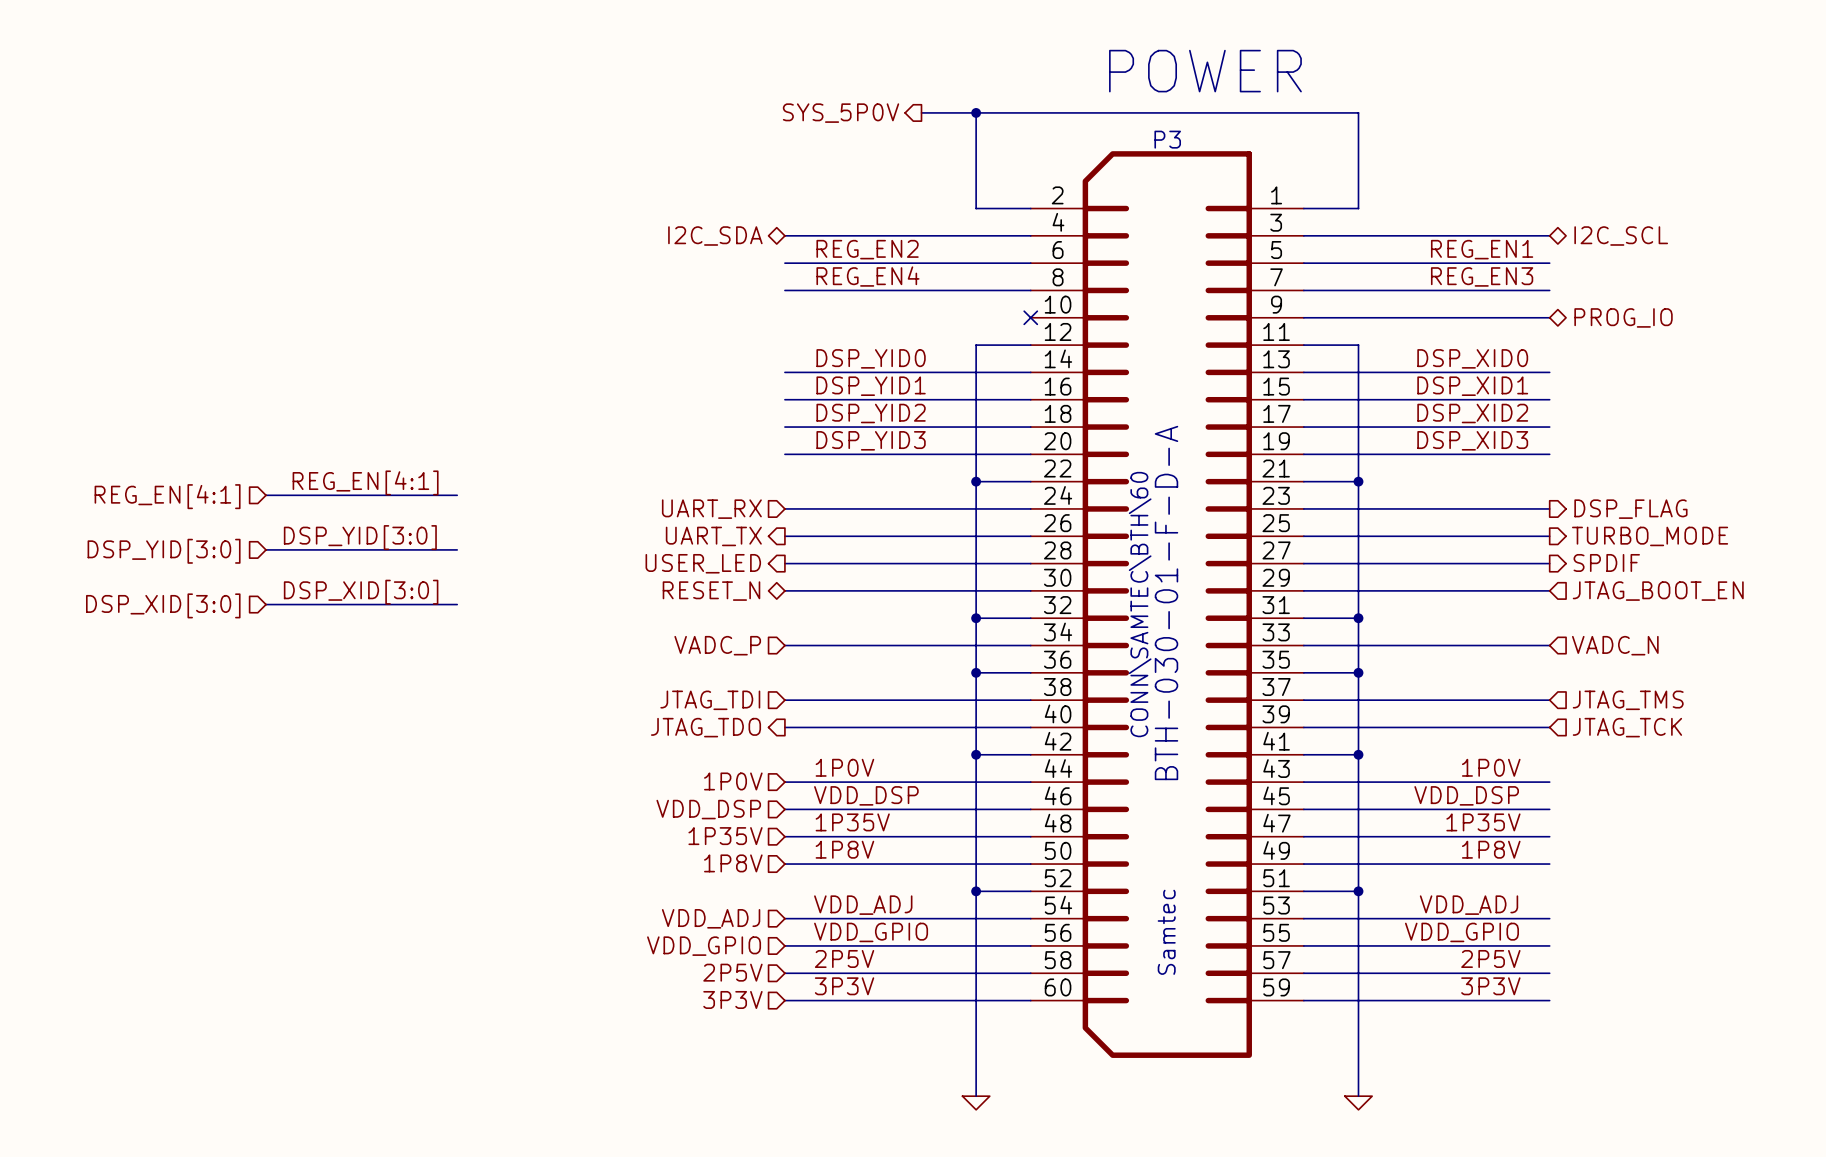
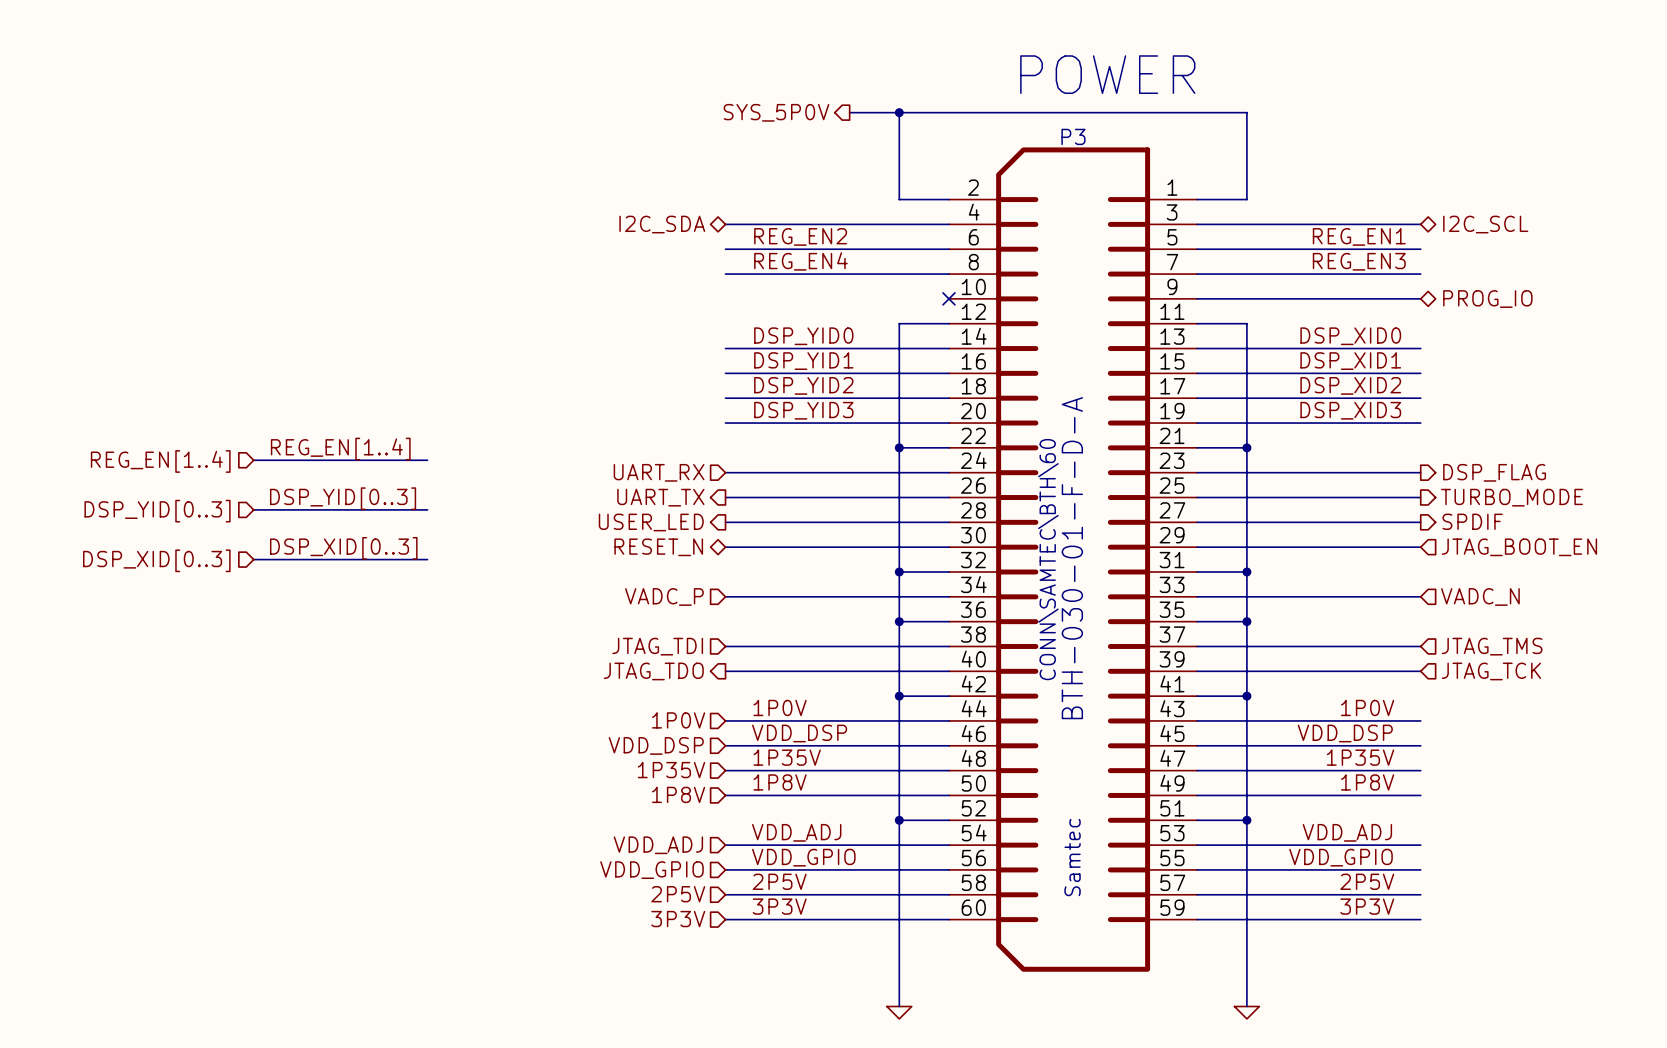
label: REG_EN[4:1] (365, 482) -> REG_EN[1..4] (340, 449)
hierarchical label: REG_EN[4:1] (167, 496) -> REG_EN[1..4] (160, 461)
label: DSP_YID[3:0] (360, 537) -> DSP_YID[0..3] (343, 498)
hierarchical label: DSP_YID[3:0] (164, 551) -> DSP_YID[0..3] (157, 511)
label: DSP_XID[3:0] (361, 592) -> DSP_XID[0..3] (343, 548)
hierarchical label: DSP_XID[3:0] (163, 605) -> DSP_XID[0..3] (156, 560)

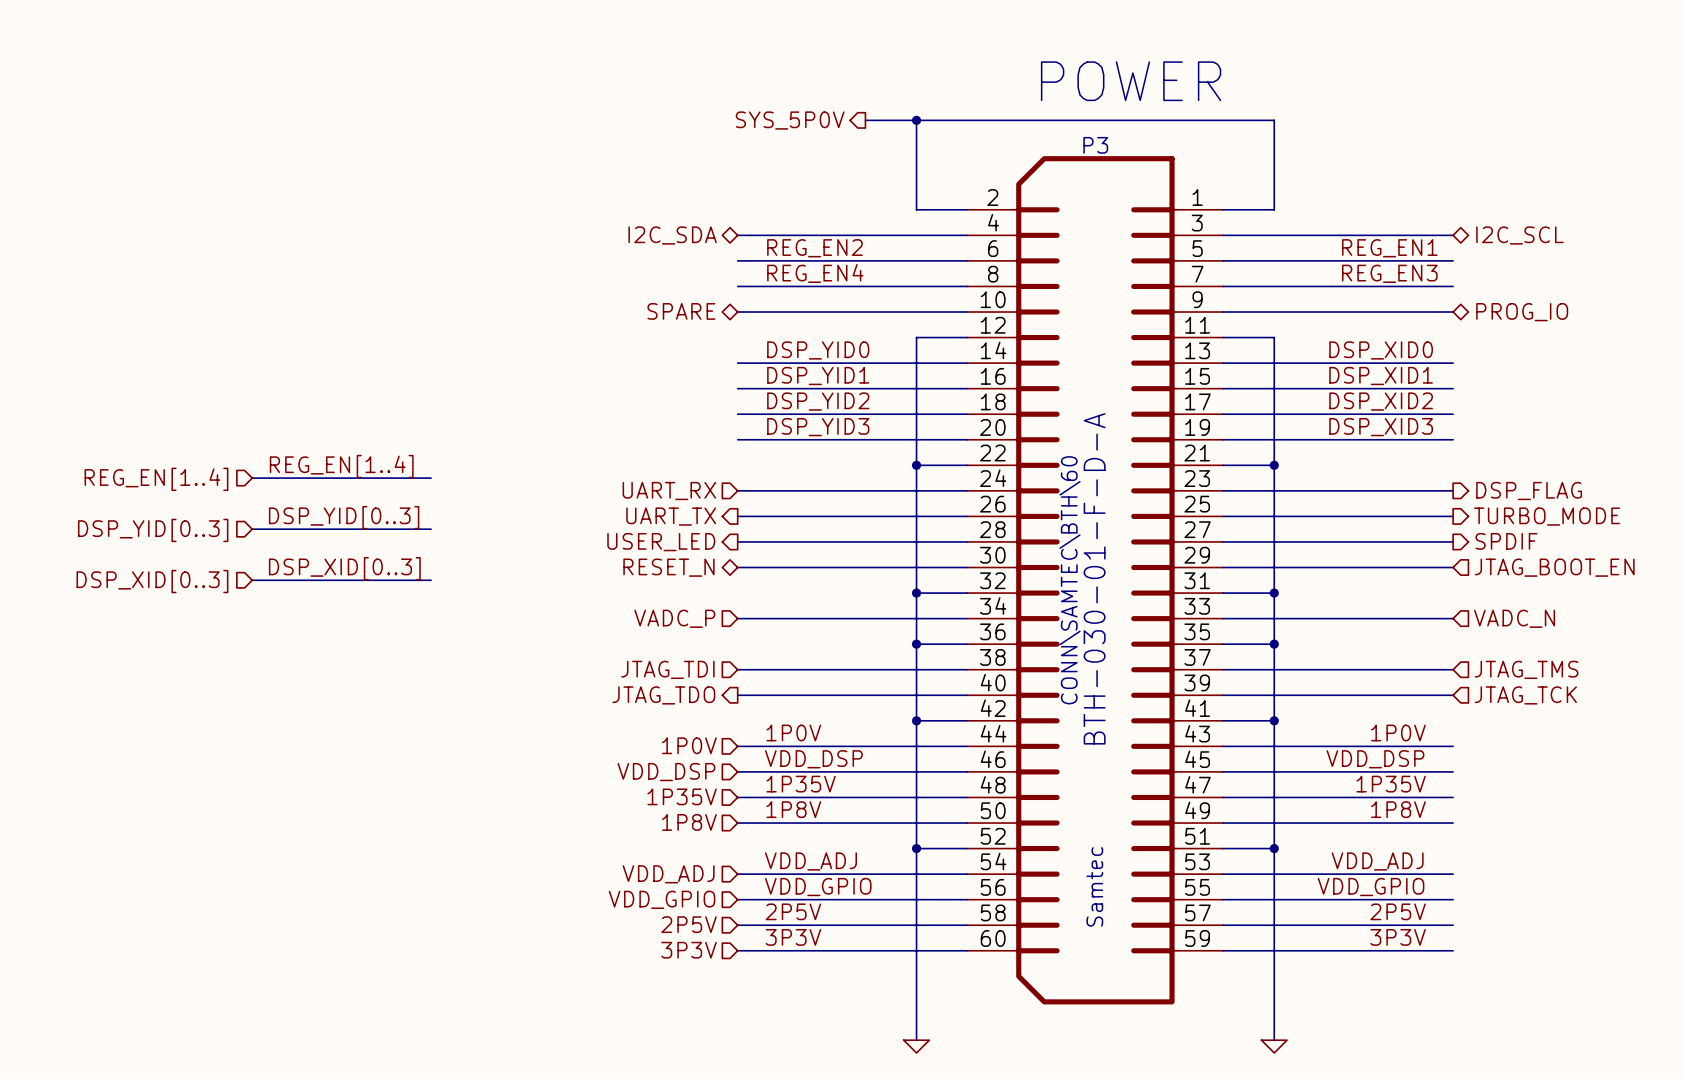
hierarchical label: none -> SPARE (681, 311)
wire: none -> (737, 312) (967, 312)
no-connect mark: (948, 298) -> none

